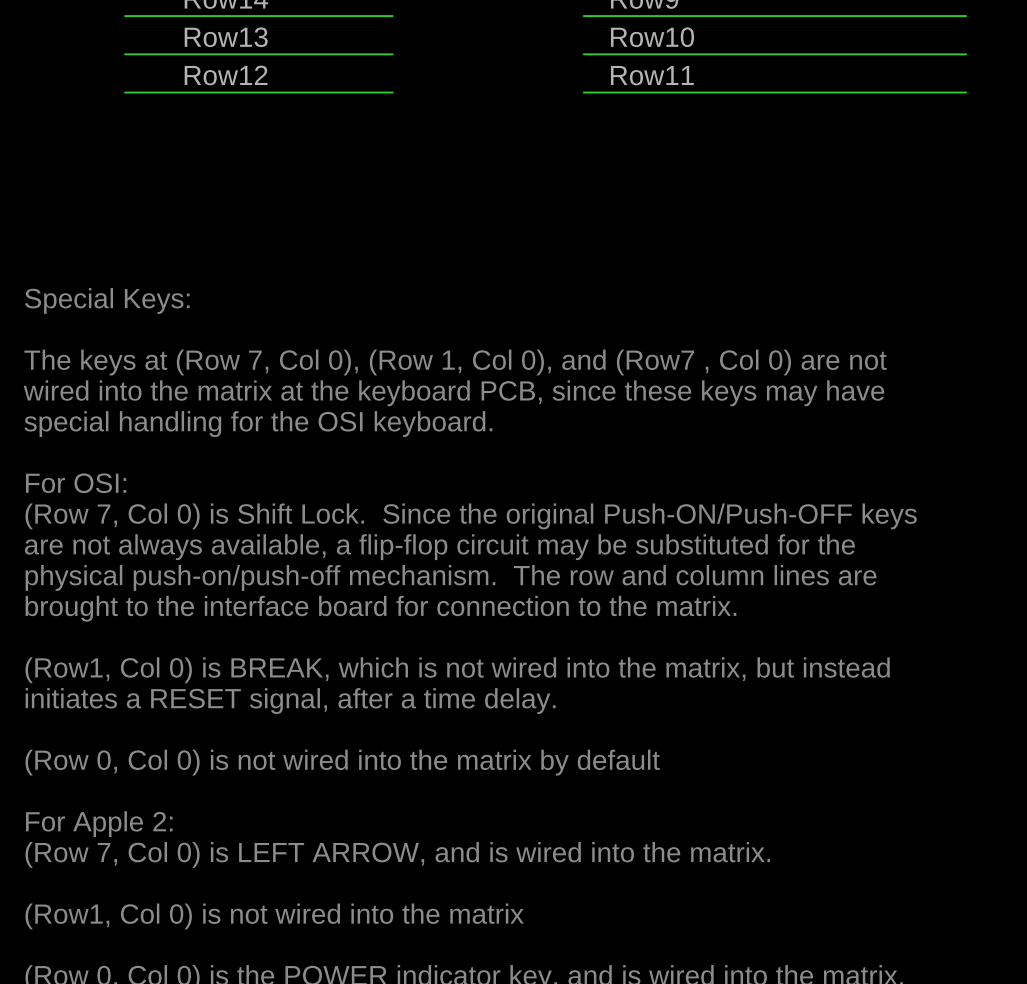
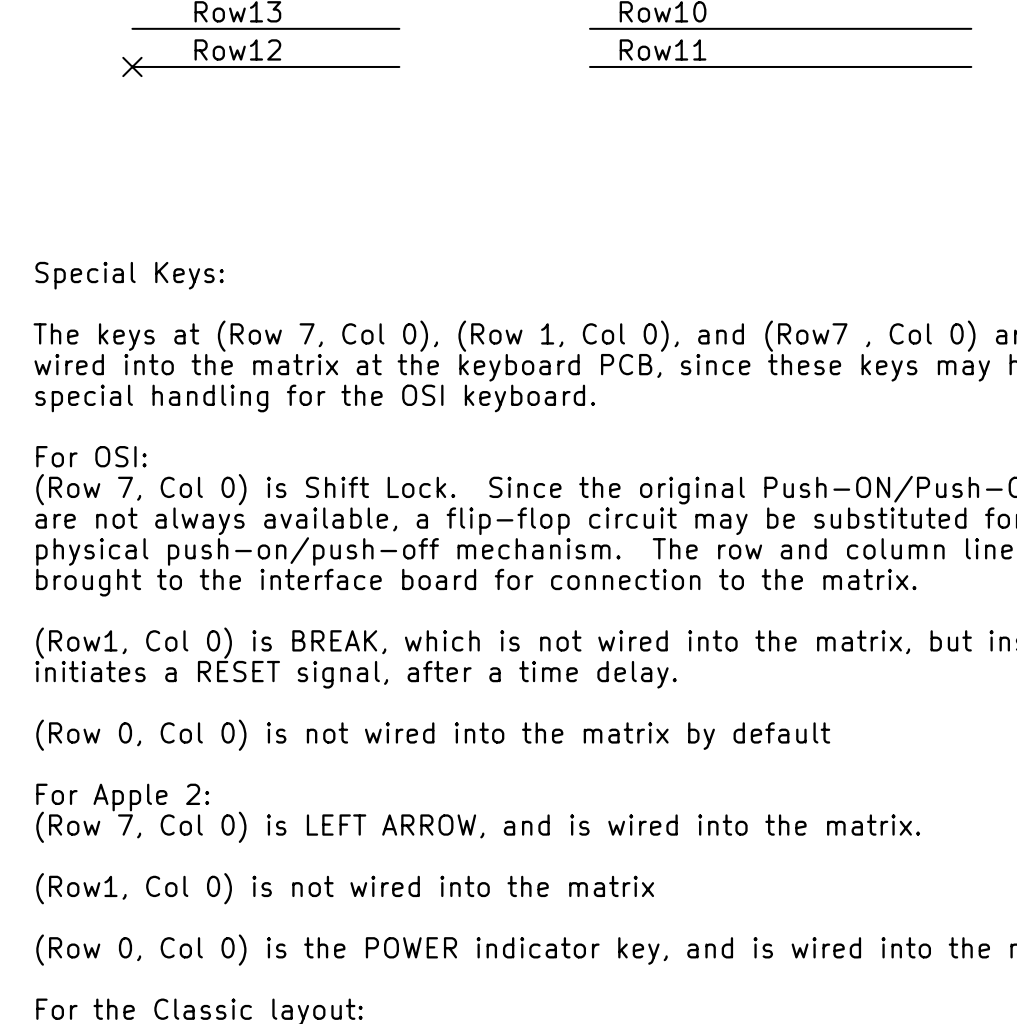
no-connect mark: none -> (132, 66)

